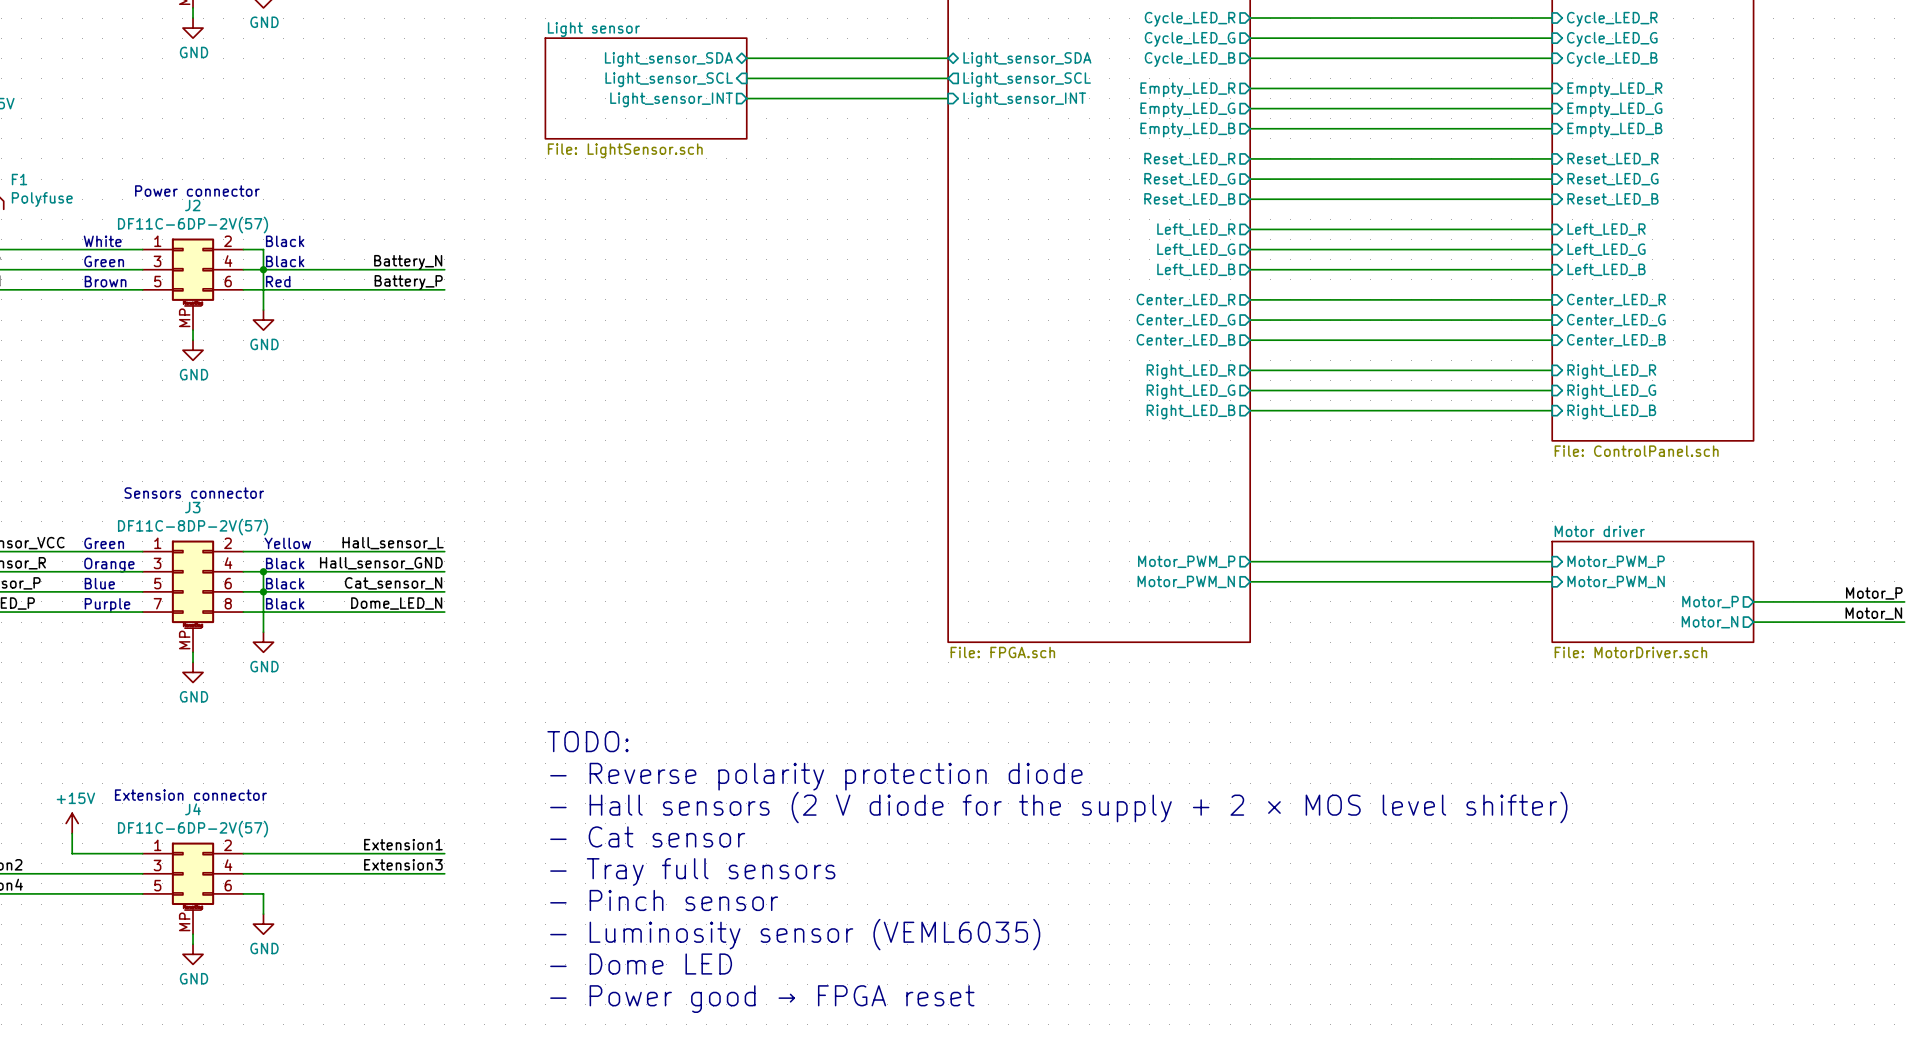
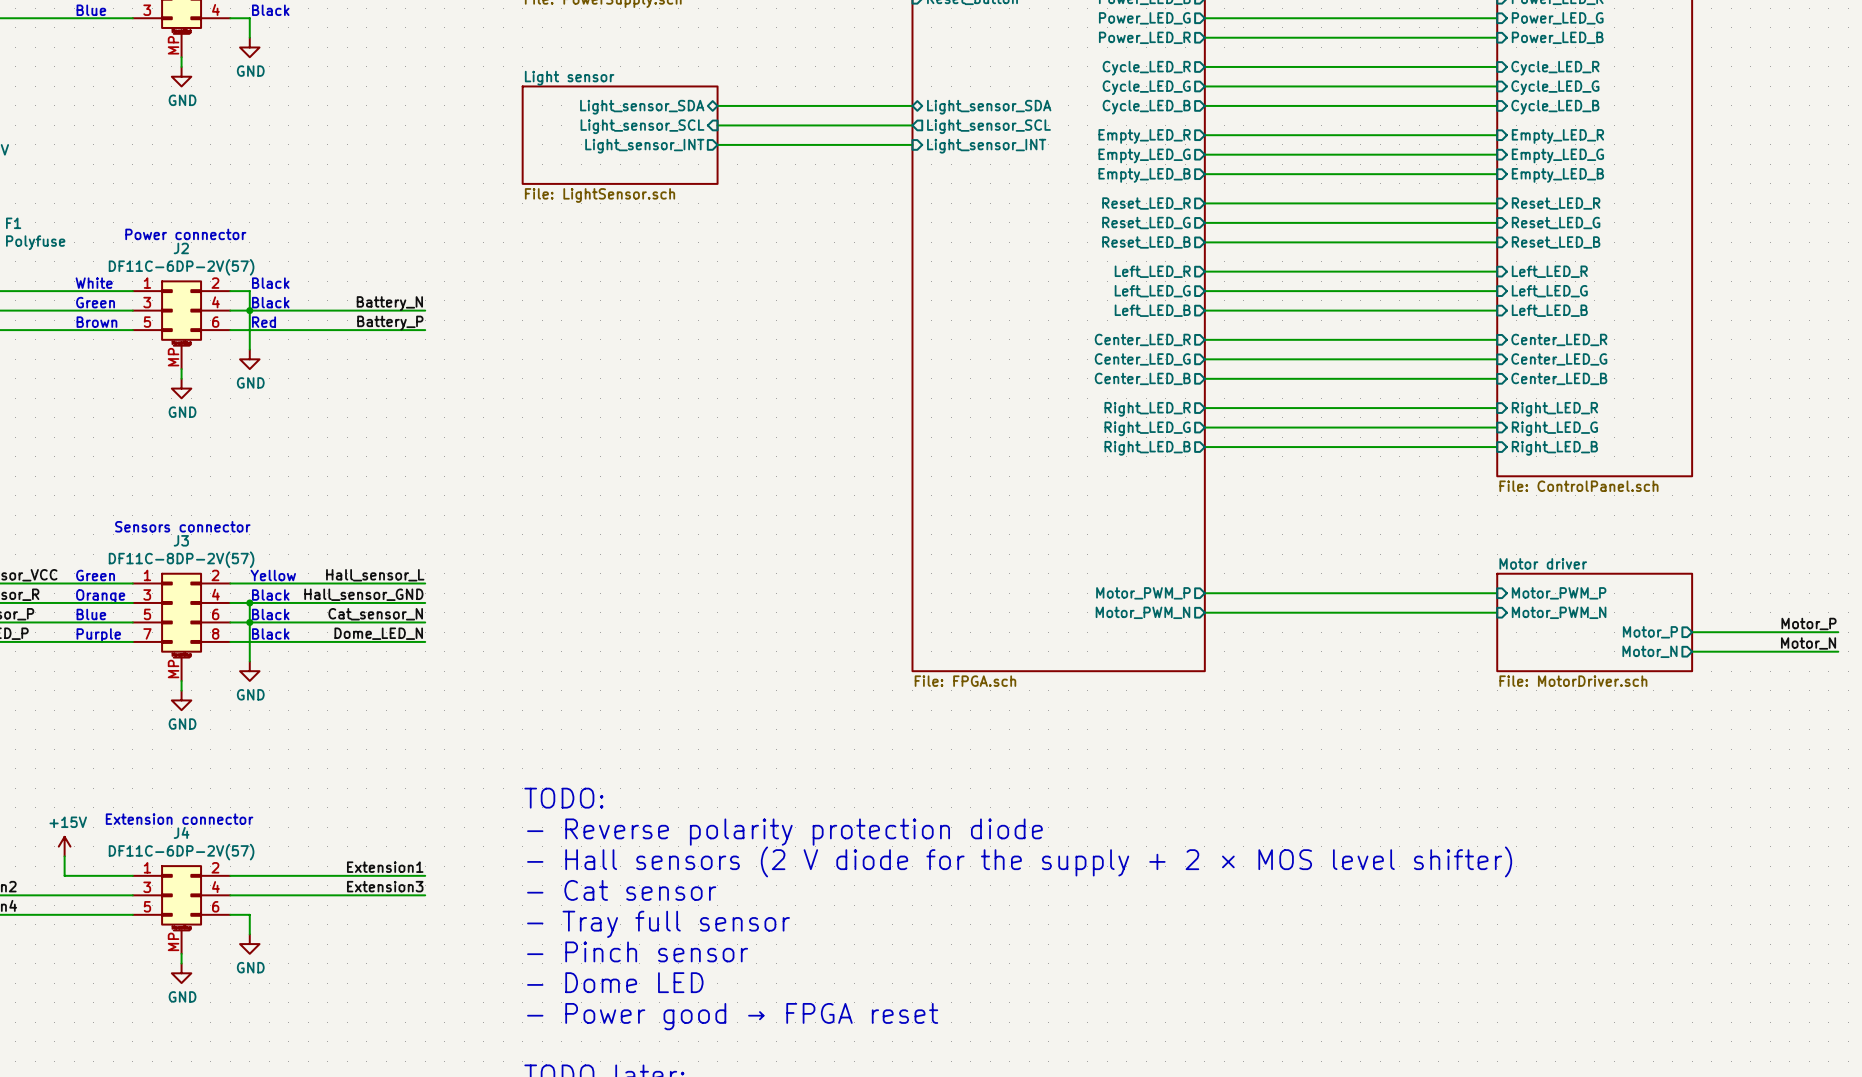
text: TODO: (588, 741) -> none
text: - Reverse polarity protection diode (816, 776) -> TODO: (563, 798)
text: - Hall sensors (2 V diode for the supply + 2 × MOS level shifter) (1058, 807) -> - Reverse polarity protection diode (784, 832)
text: - Cat sensor (647, 836) -> - Hall sensors (2 V diode for the supply + 2 × MOS level shifter) (1019, 861)
text: - Tray full sensors (692, 871) -> - Cat sensor (621, 890)
text: - Pinch sensor (664, 900) -> - Tray full sensor (658, 924)
text: - Luminosity sensor (VEML6035) (795, 934) -> - Pinch sensor (637, 951)

